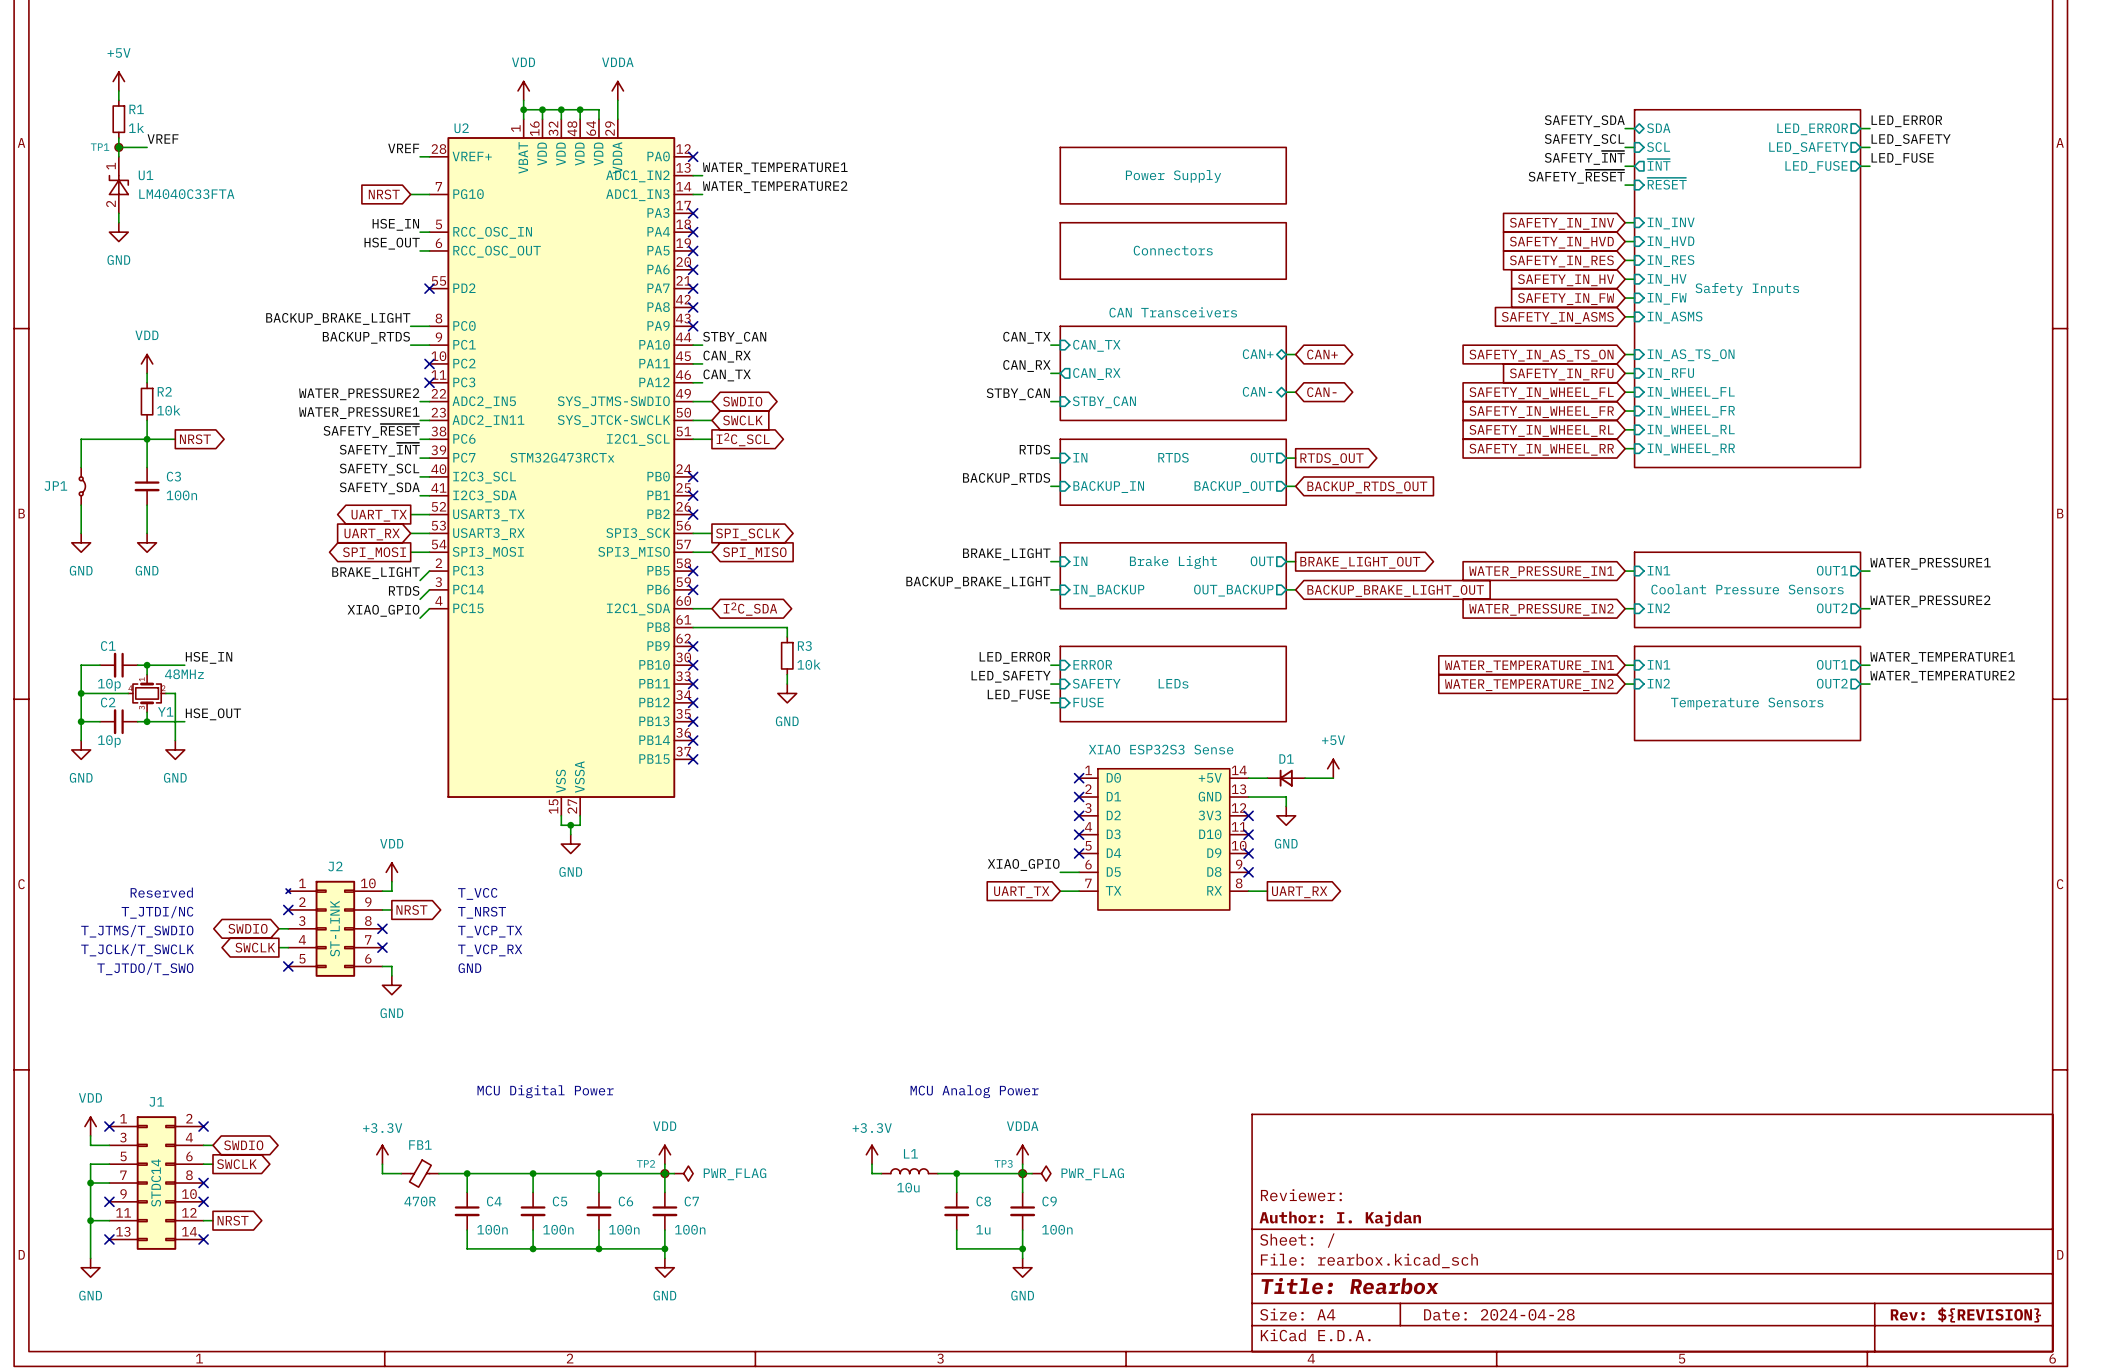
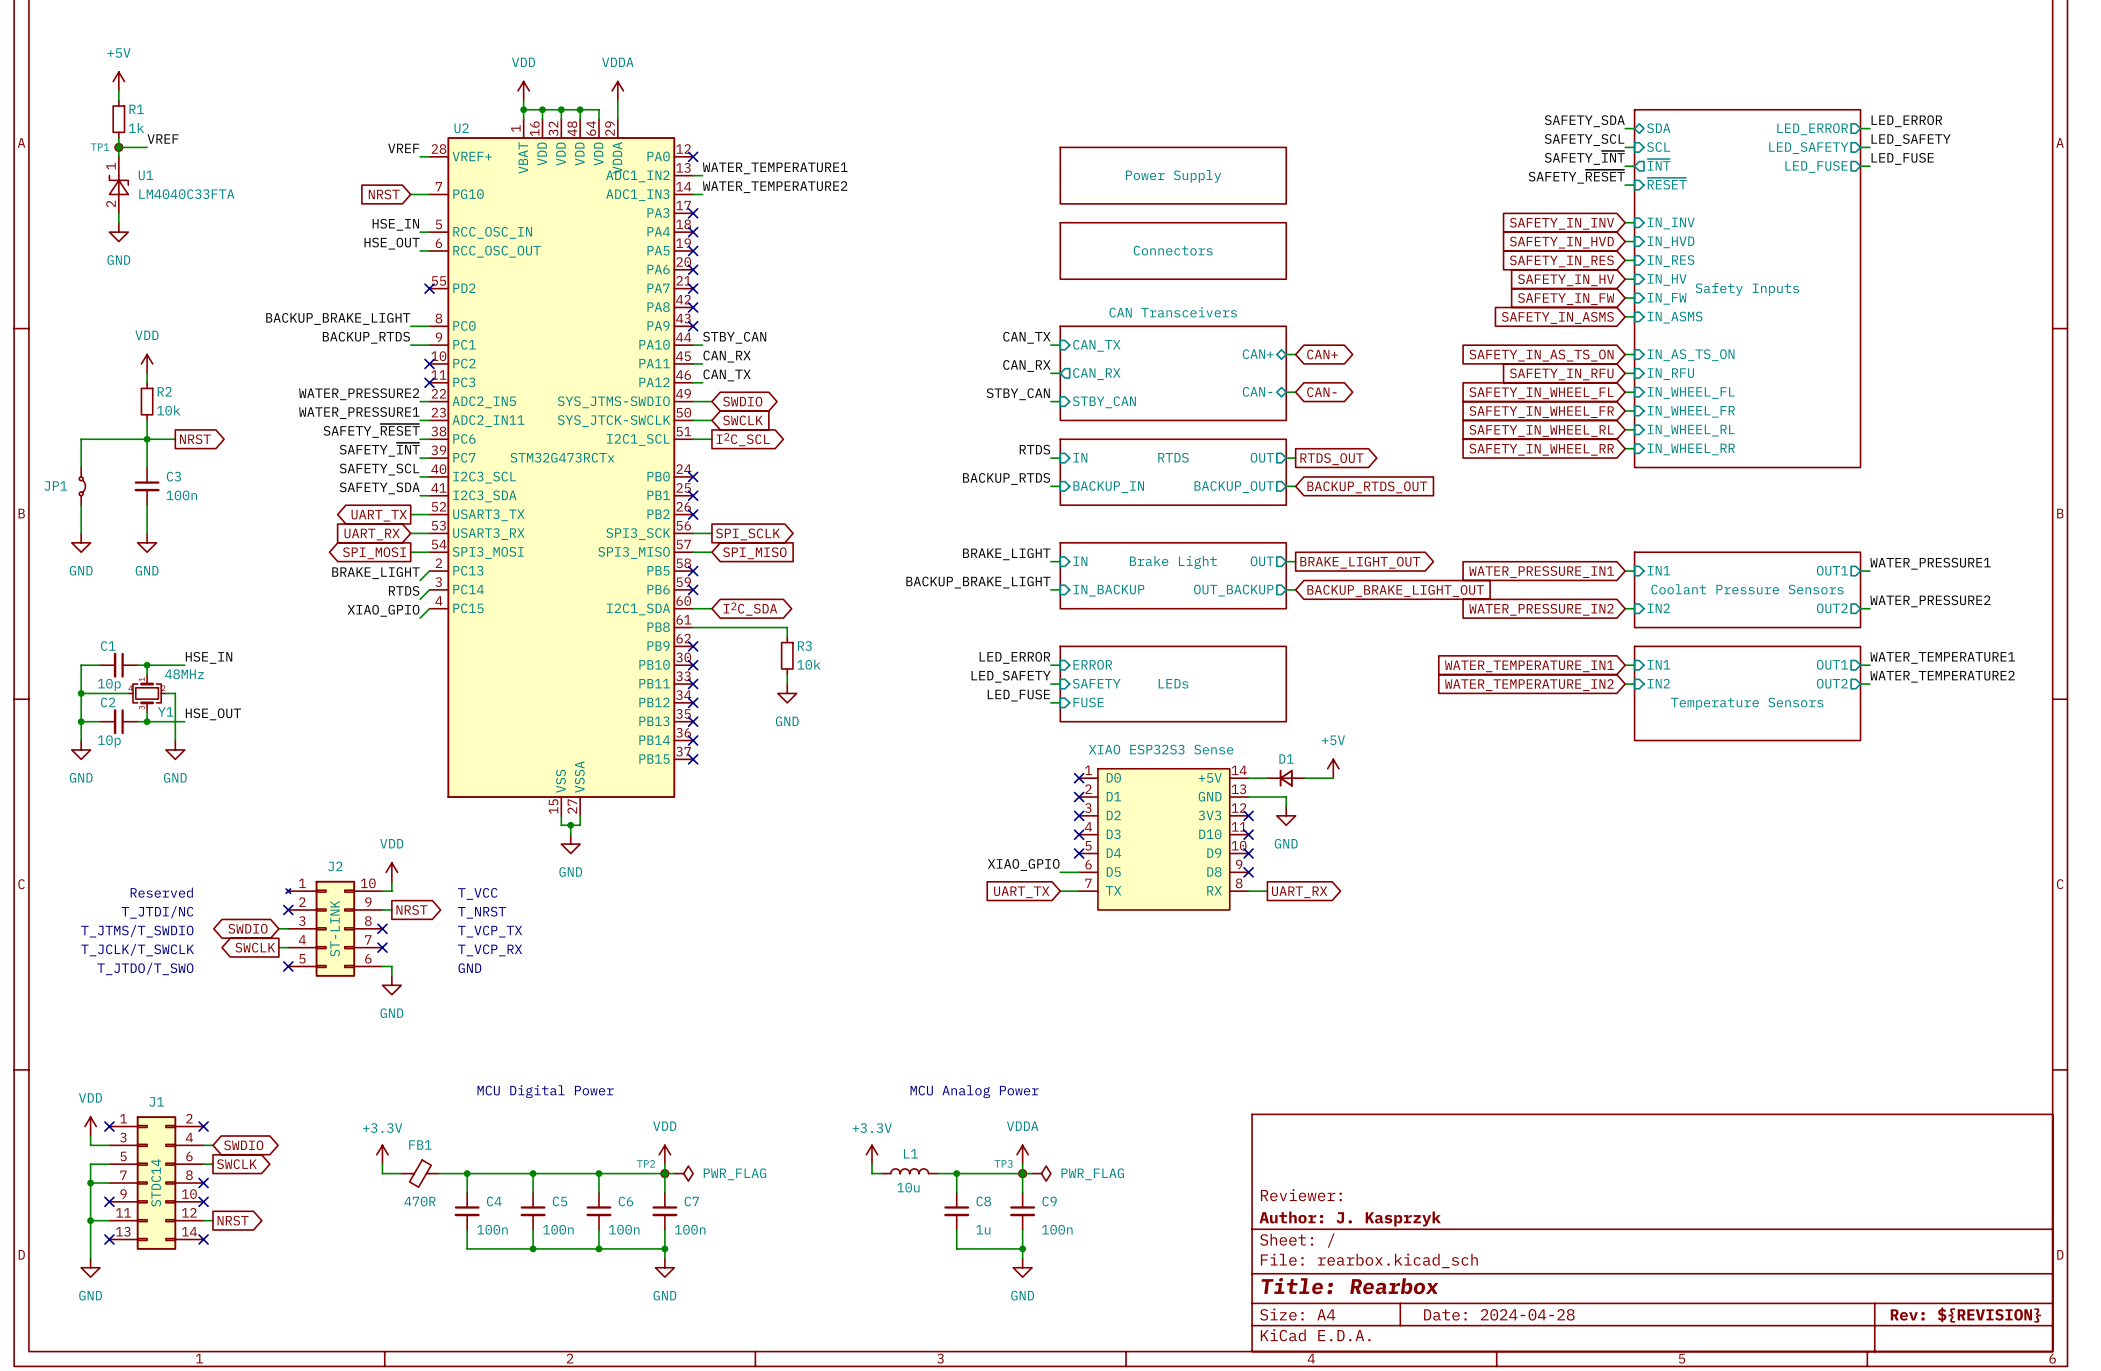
title block: Author: I. Kajdan (1340, 1218) -> Author: J. Kasprzyk (1350, 1218)

